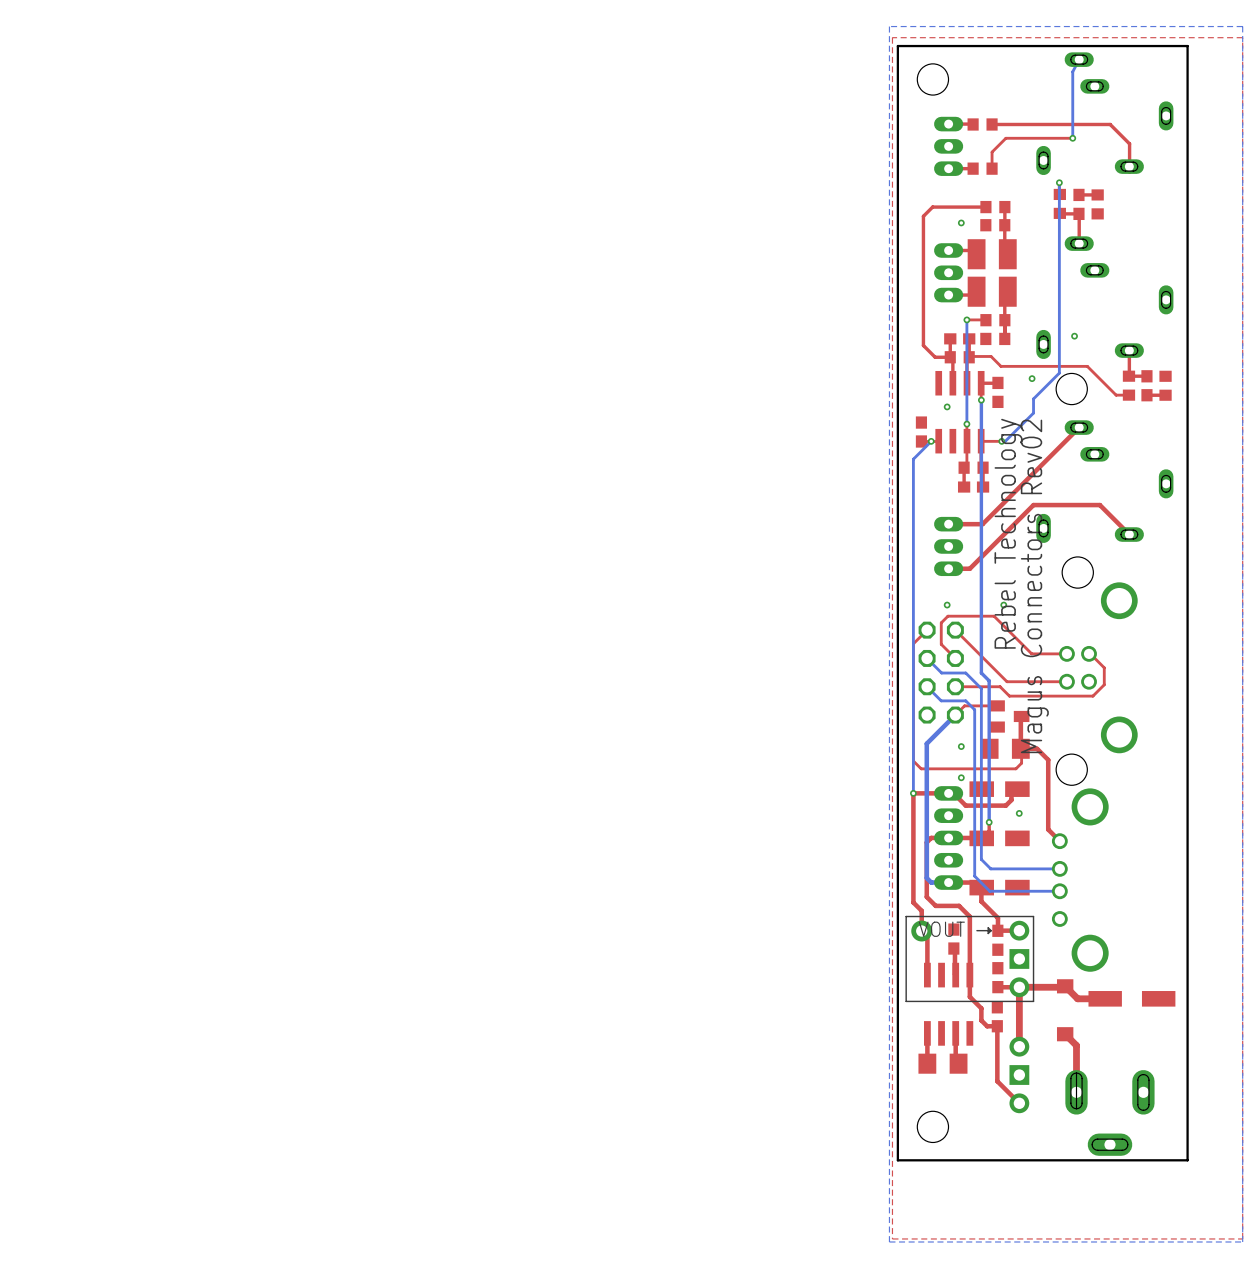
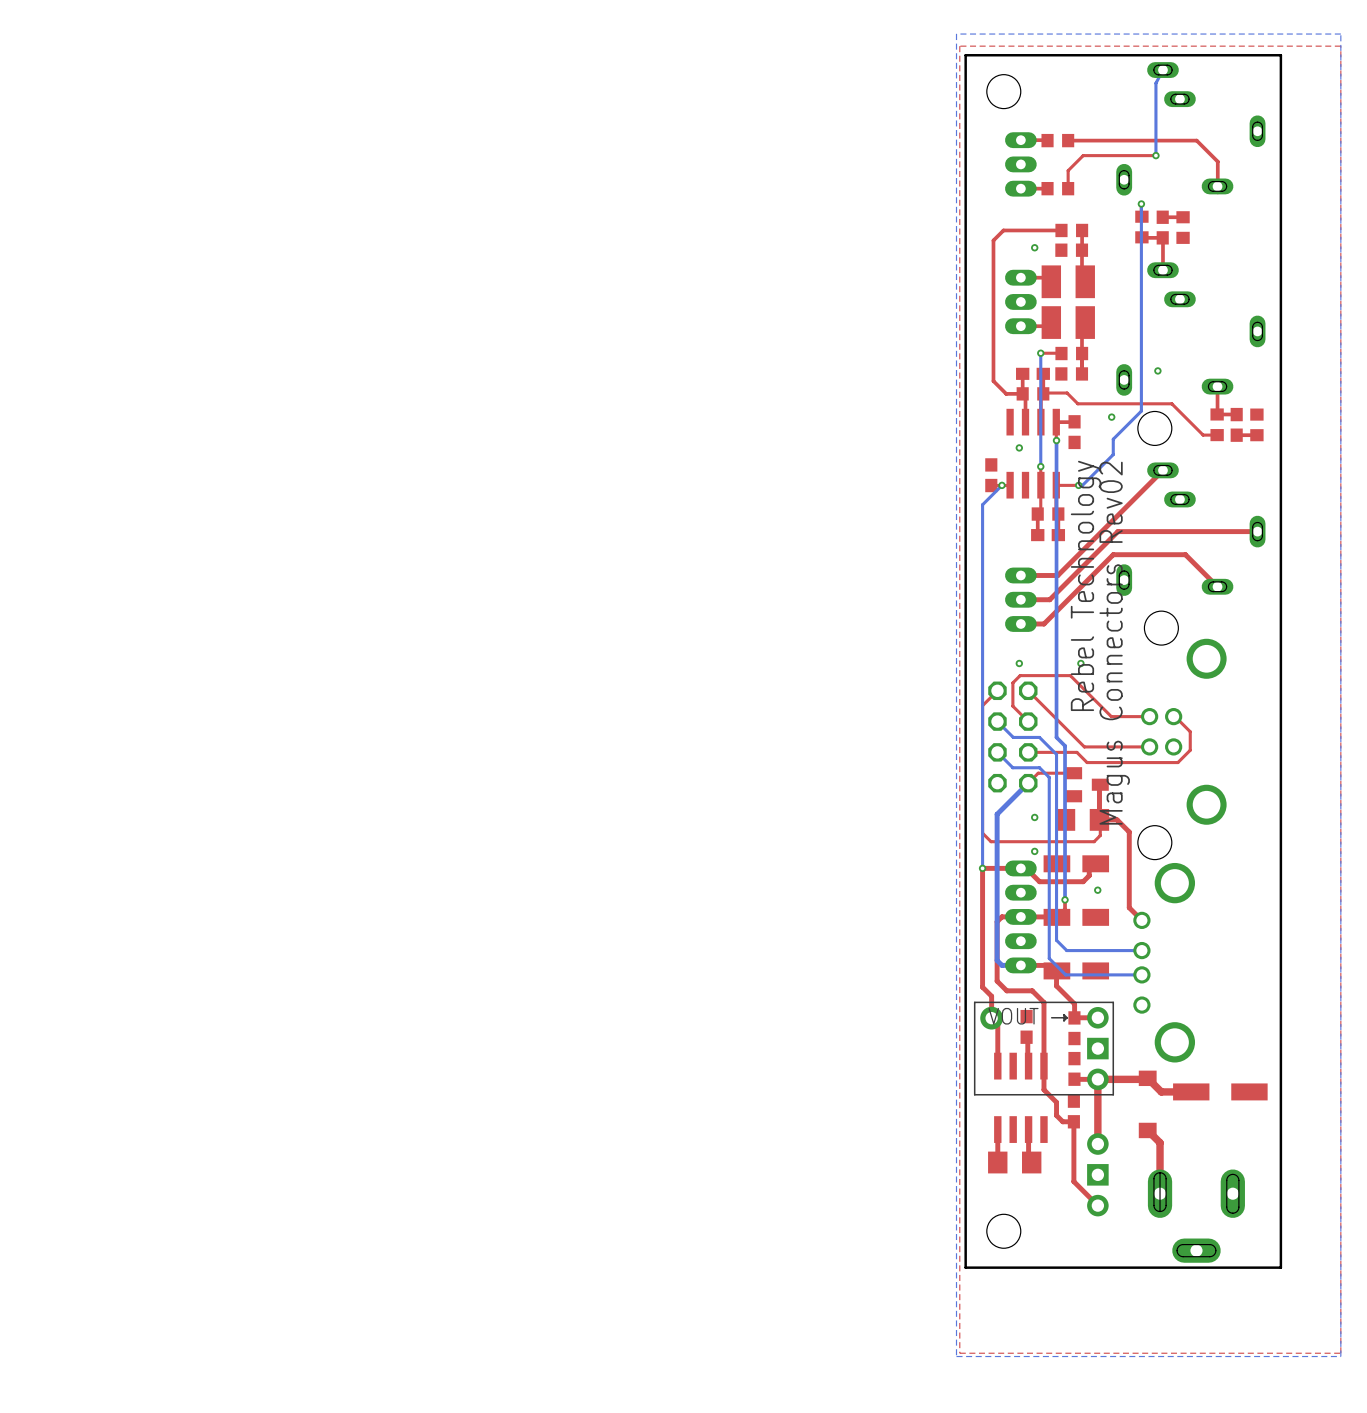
top track: none -> (1257, 531) (1117, 531) (1049, 599) (1020, 599)

